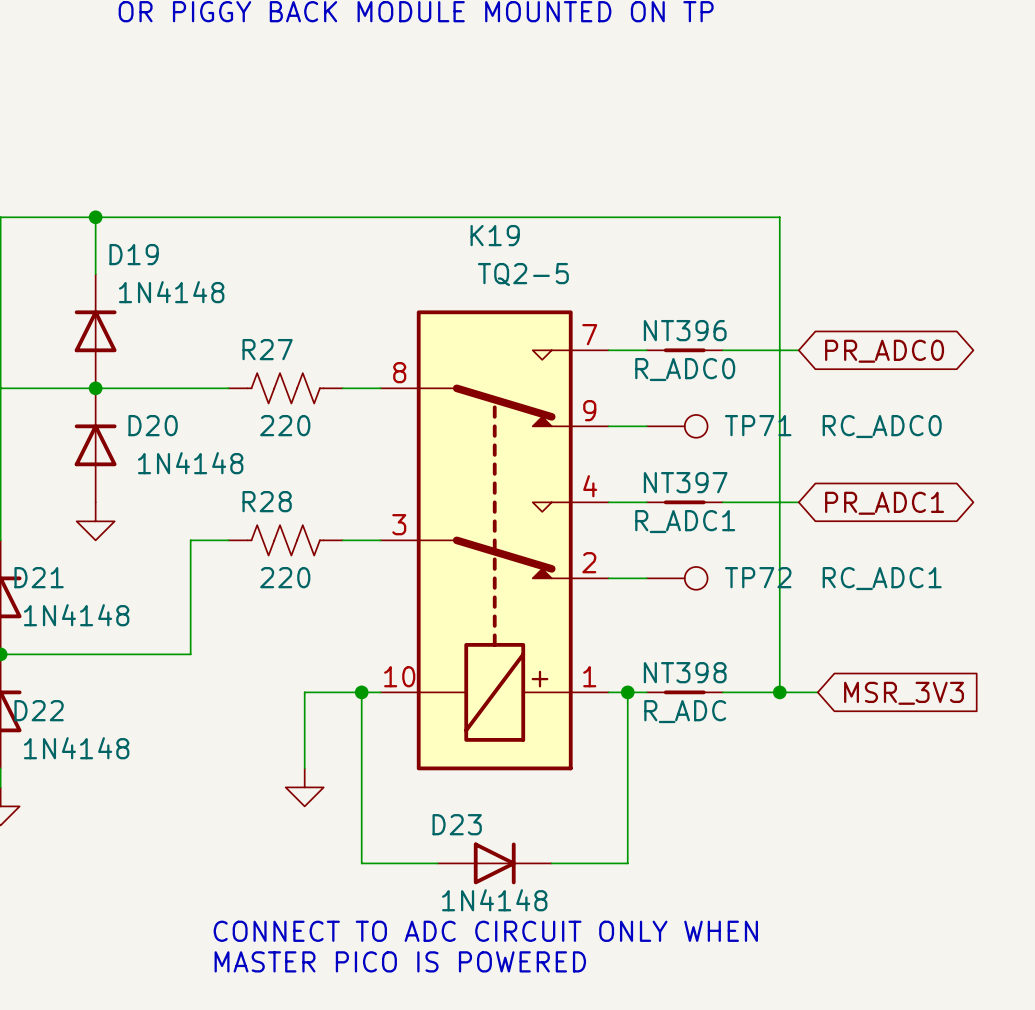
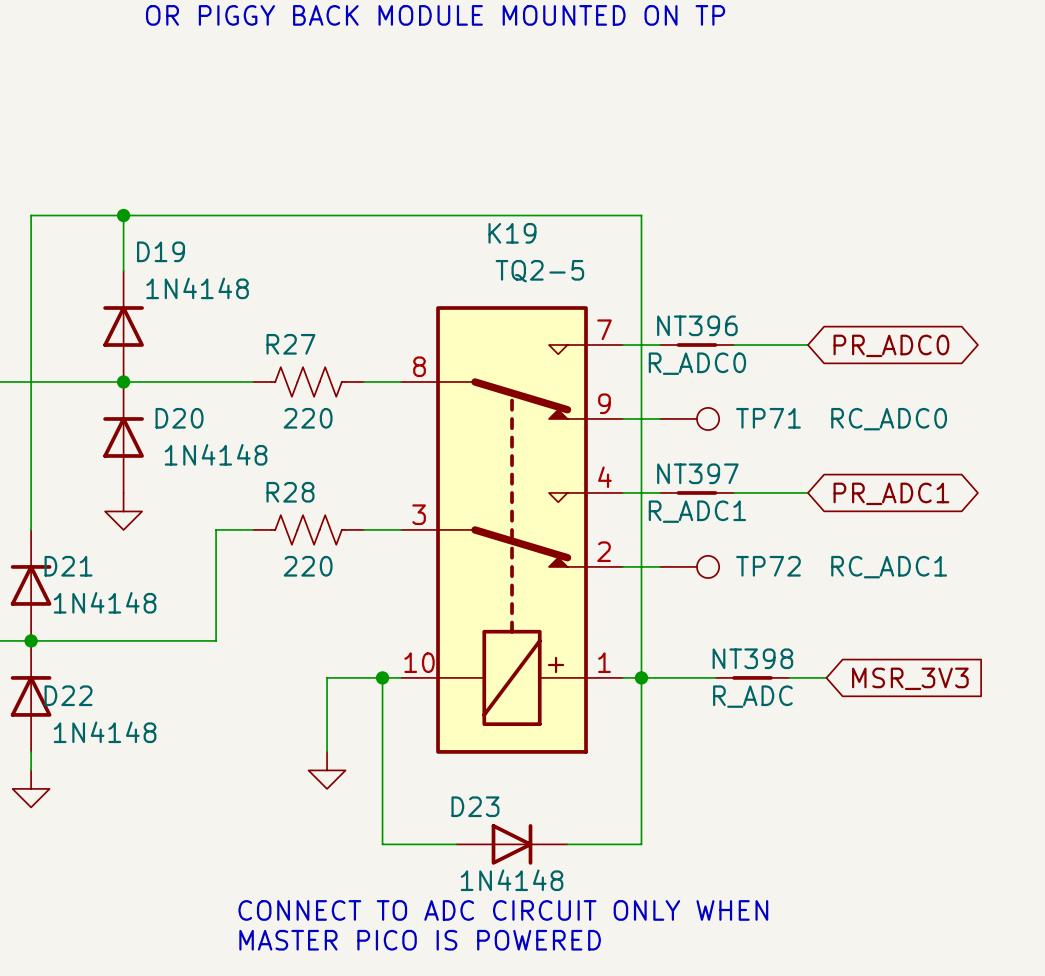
wire: (627, 217) (779, 217) (779, 692) (722, 692) -> (641, 215) (641, 677)
NT398 position: (684, 692) -> (752, 677)
junction: (779, 692) -> none

